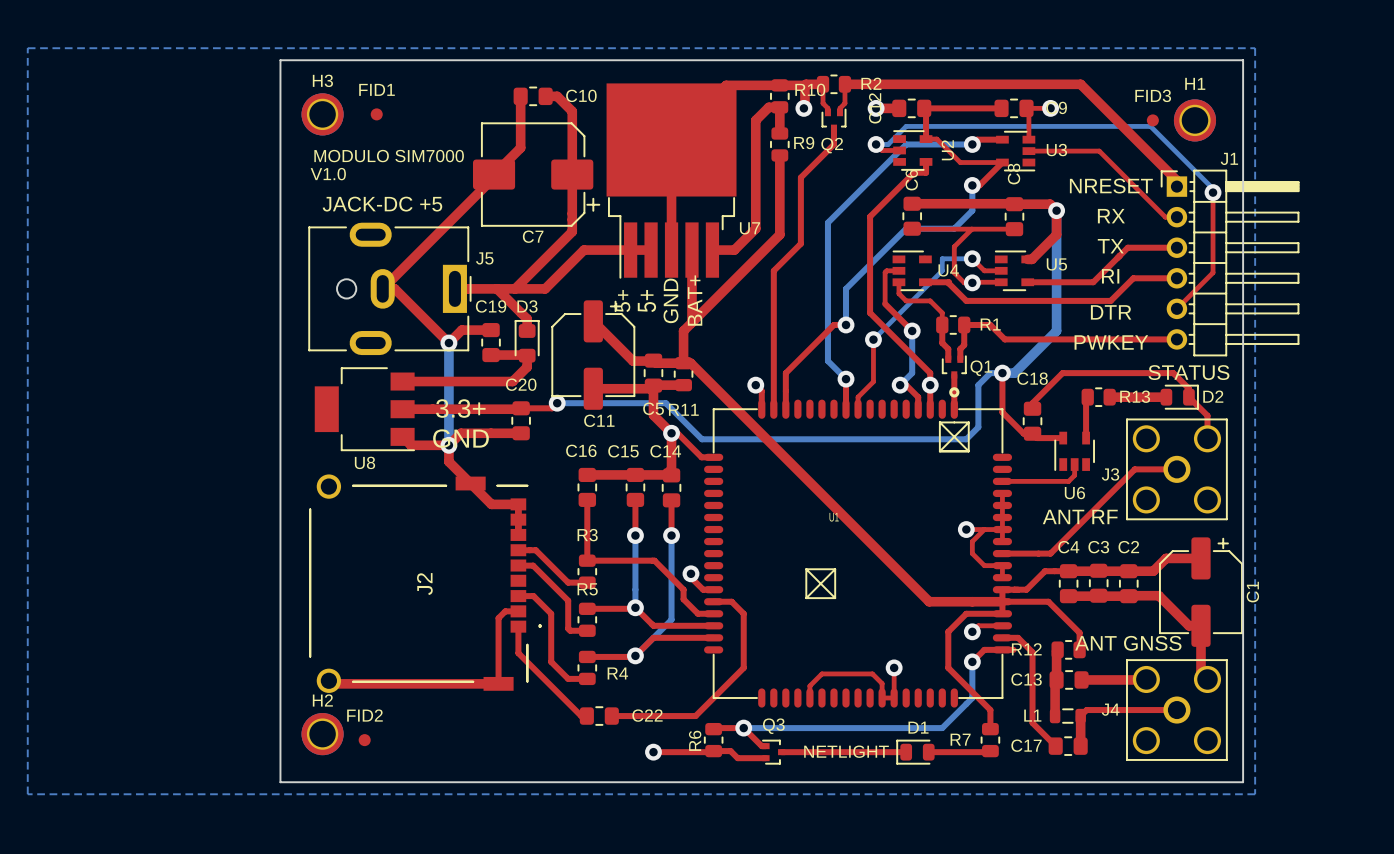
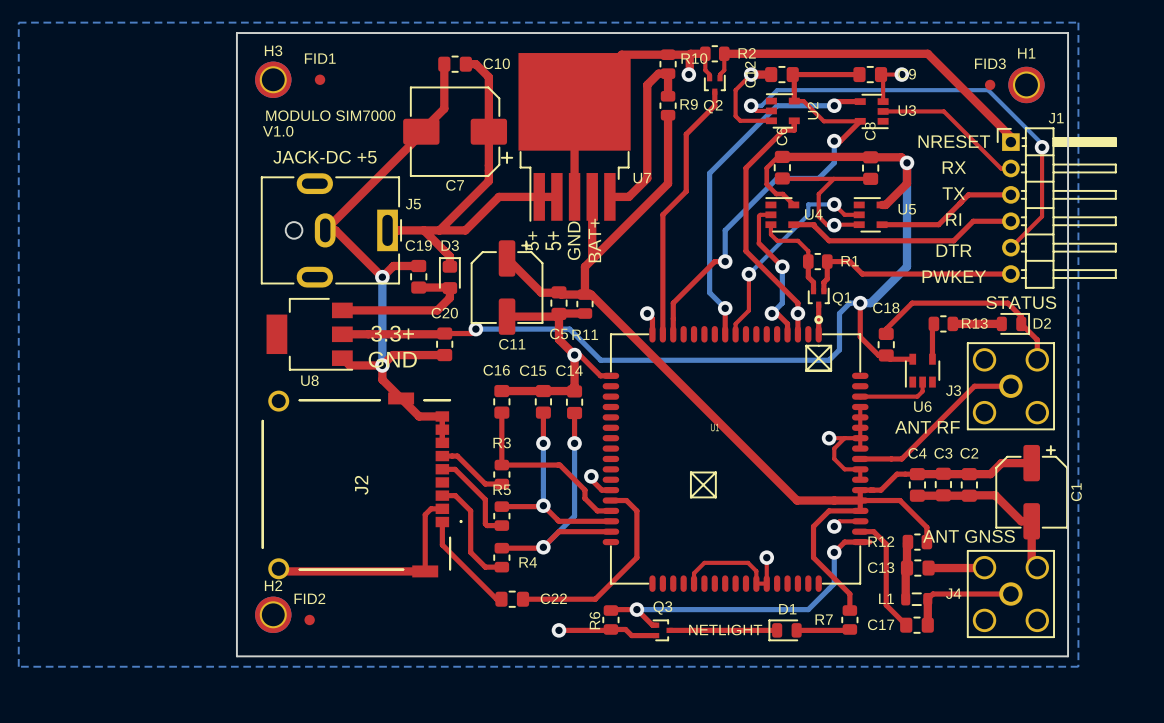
top track: none -> (751, 74) (735, 90) (735, 116) (740, 120) (771, 120)
top track: none -> (782, 156) (777, 156) (766, 168) (766, 184) (776, 194) (782, 194) (793, 204)

